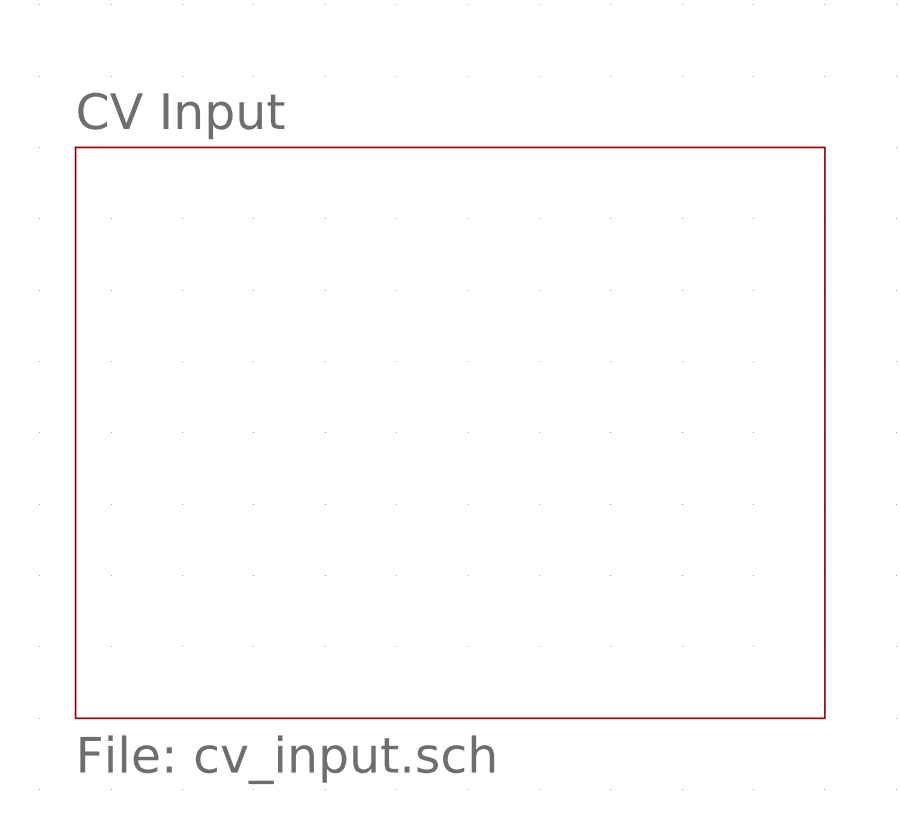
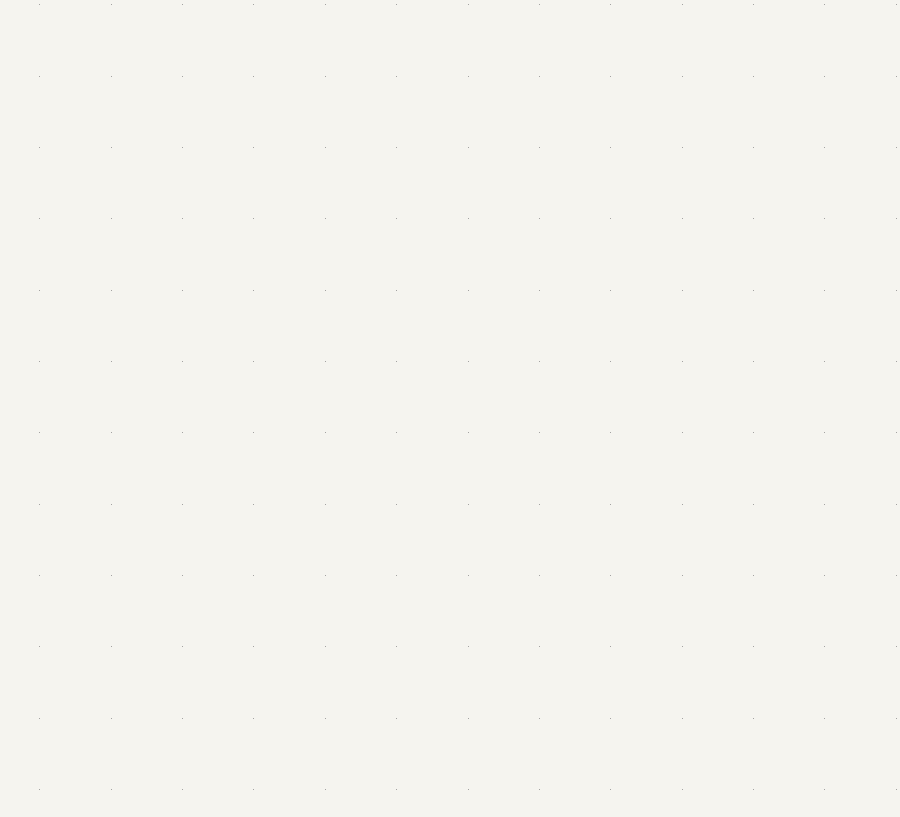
sheet CV Input: File: cv_input.sch (450, 432) -> none

